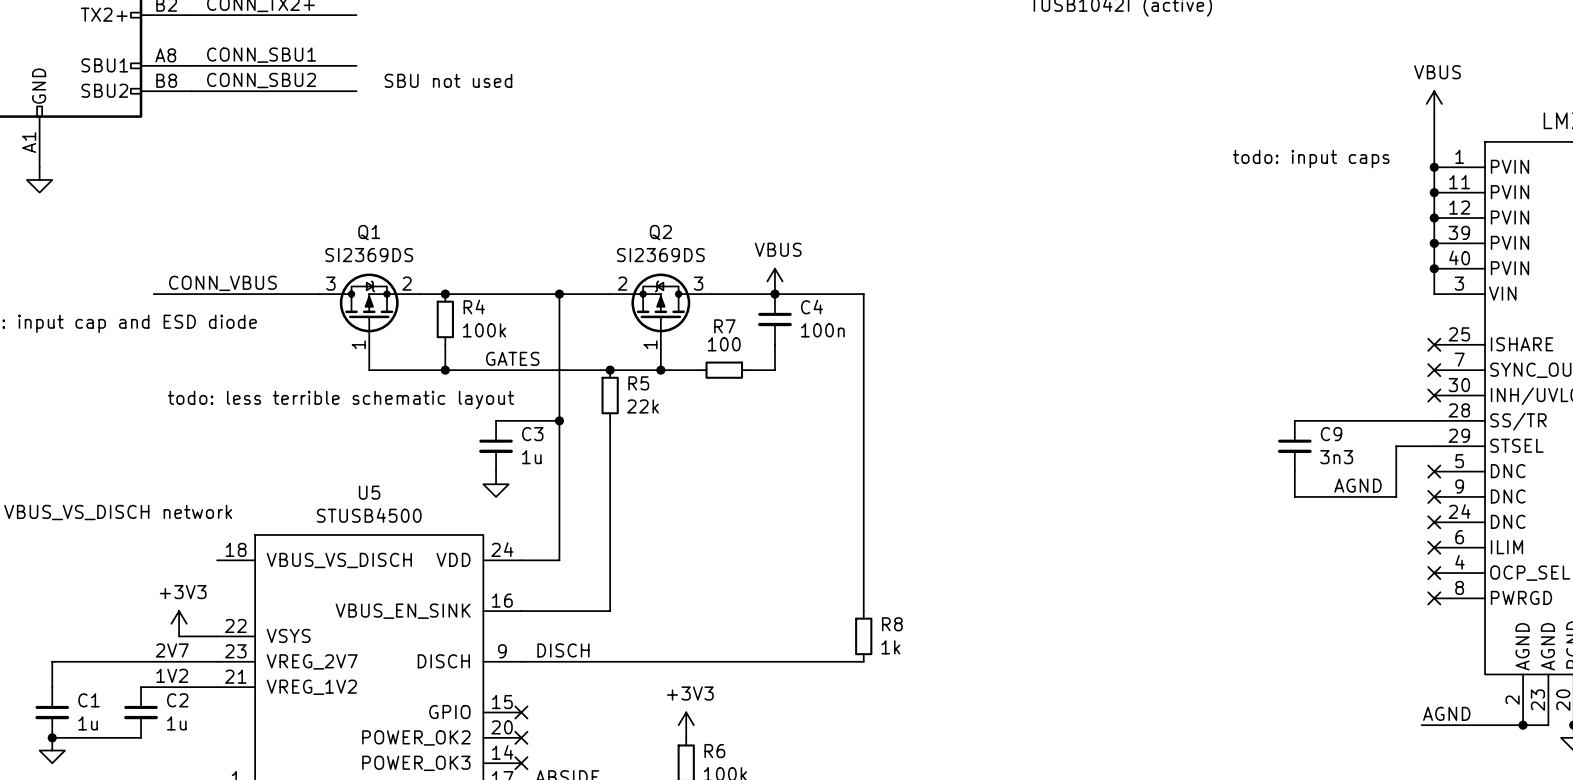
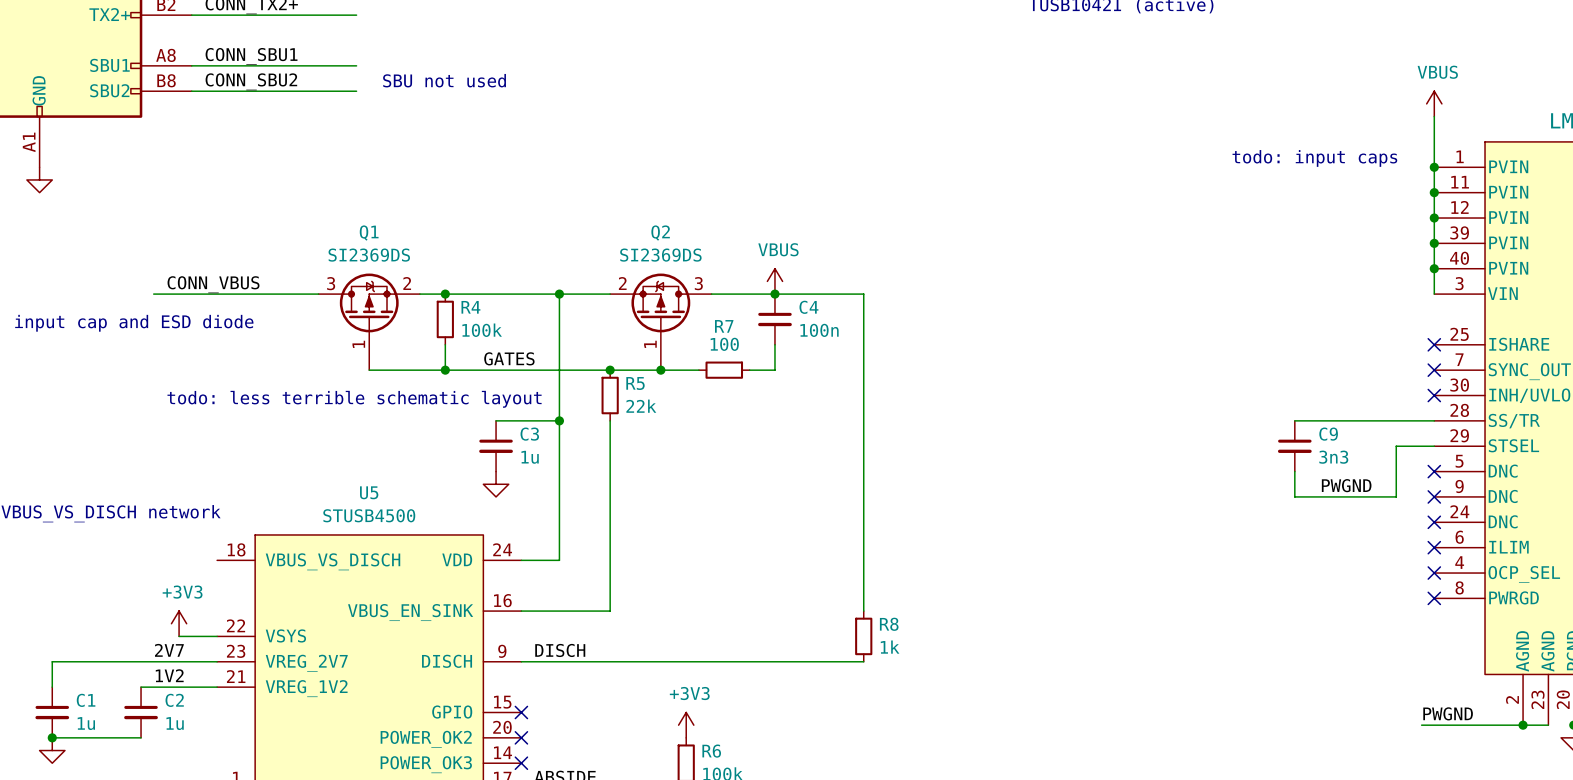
label: AGND (1358, 485) -> PWGND (1346, 485)
label: AGND (1446, 713) -> PWGND (1448, 713)

